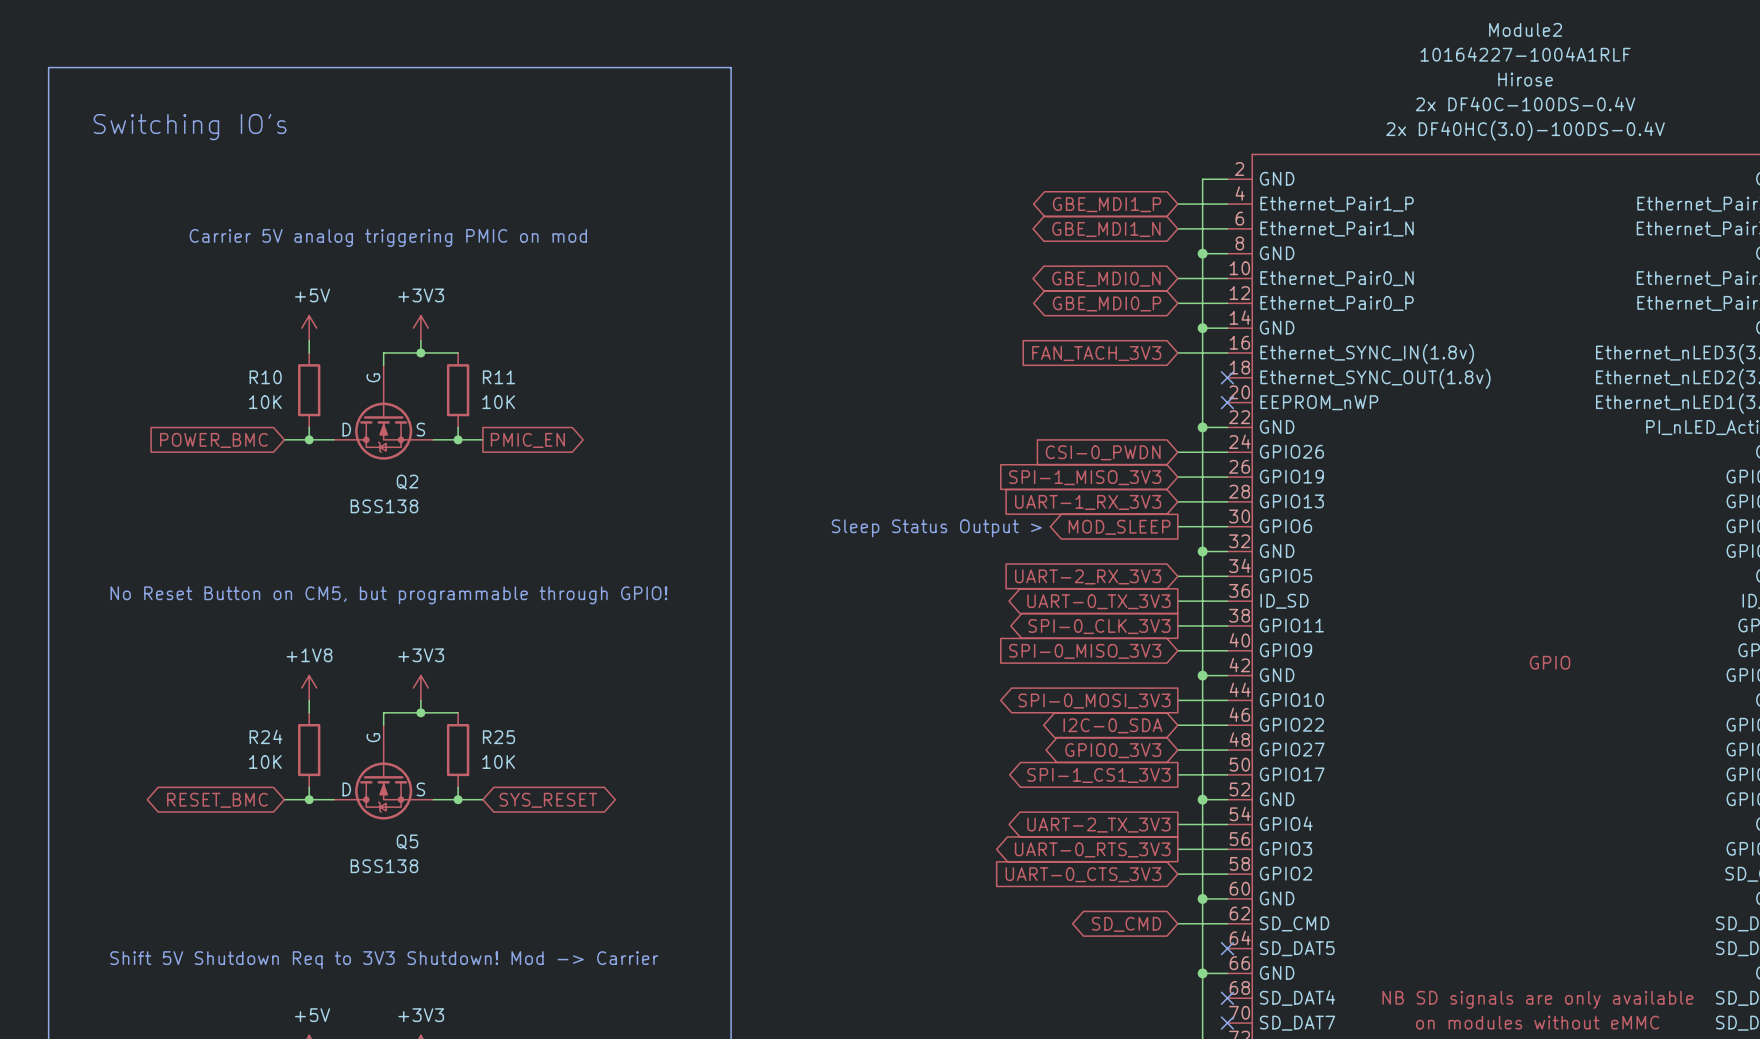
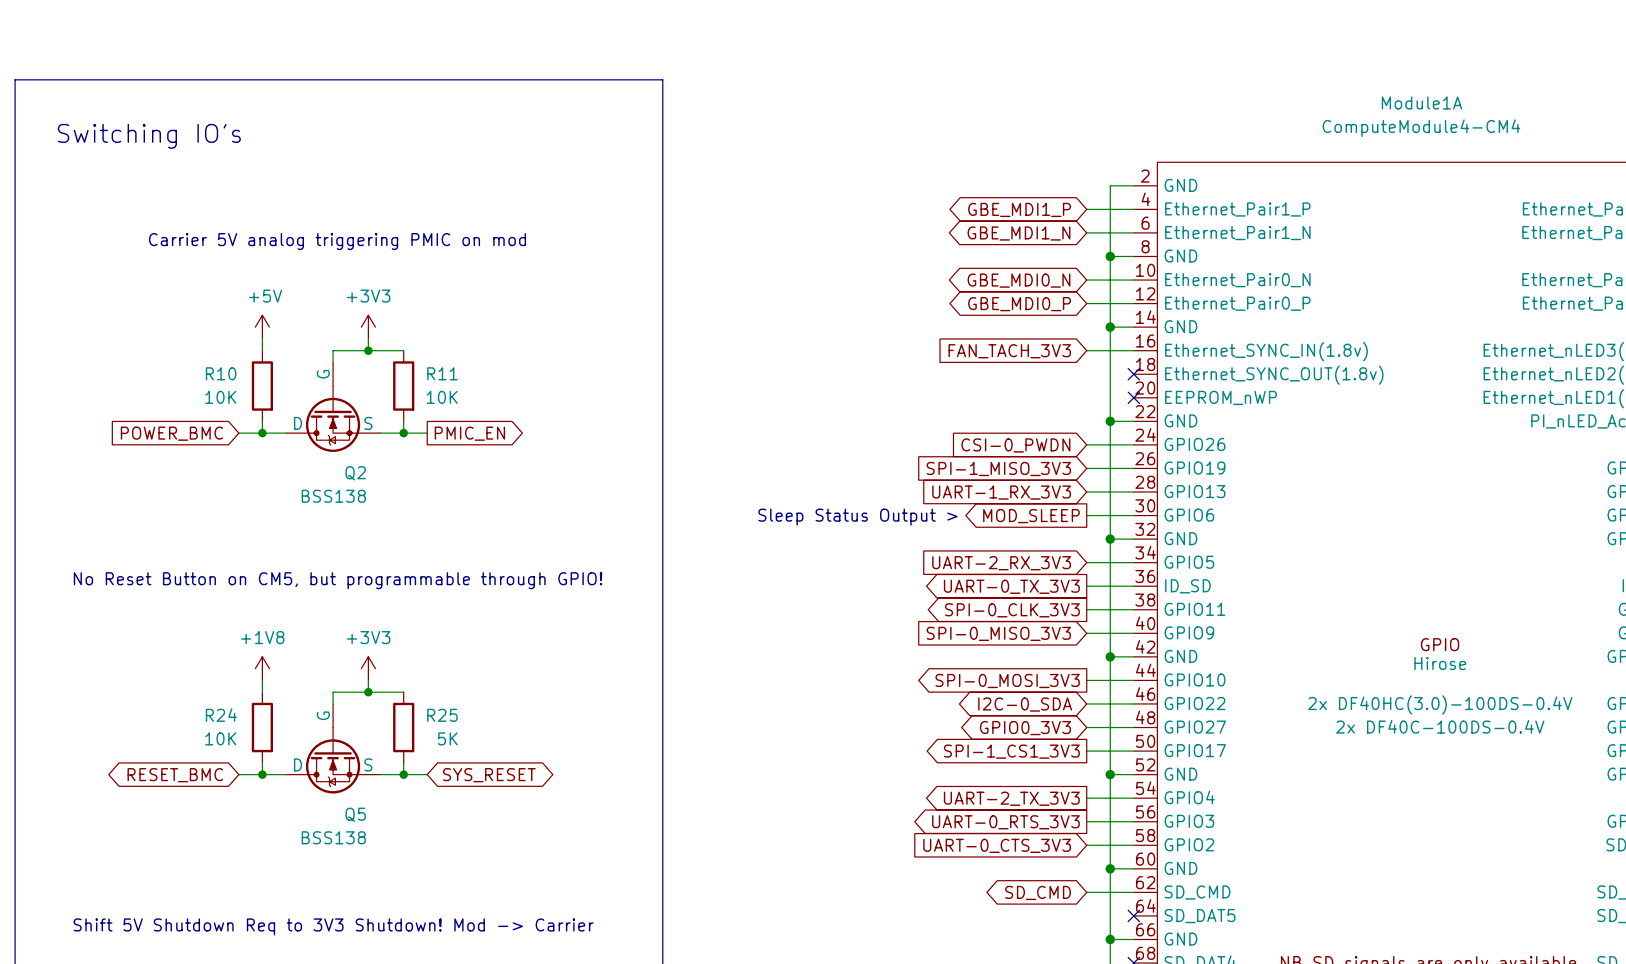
Module2 name: Module2 (1525, 29) -> Module1A (1422, 102)
Module2 value: 10164227-1004A1RLF (1525, 54) -> ComputeModule4-CM4 (1421, 128)
Module2 text position: Hirose (1525, 79) -> Hirose (1440, 663)
Module2 text position: 2x DF40C-100DS-0.4V (1525, 104) -> 2x DF40C-100DS-0.4V (1440, 726)
Module2 text position: 2x DF40HC(3.0)-100DS-0.4V (1525, 130) -> 2x DF40HC(3.0)-100DS-0.4V (1440, 704)
R25 value: 10K (498, 762) -> 5K (447, 738)

